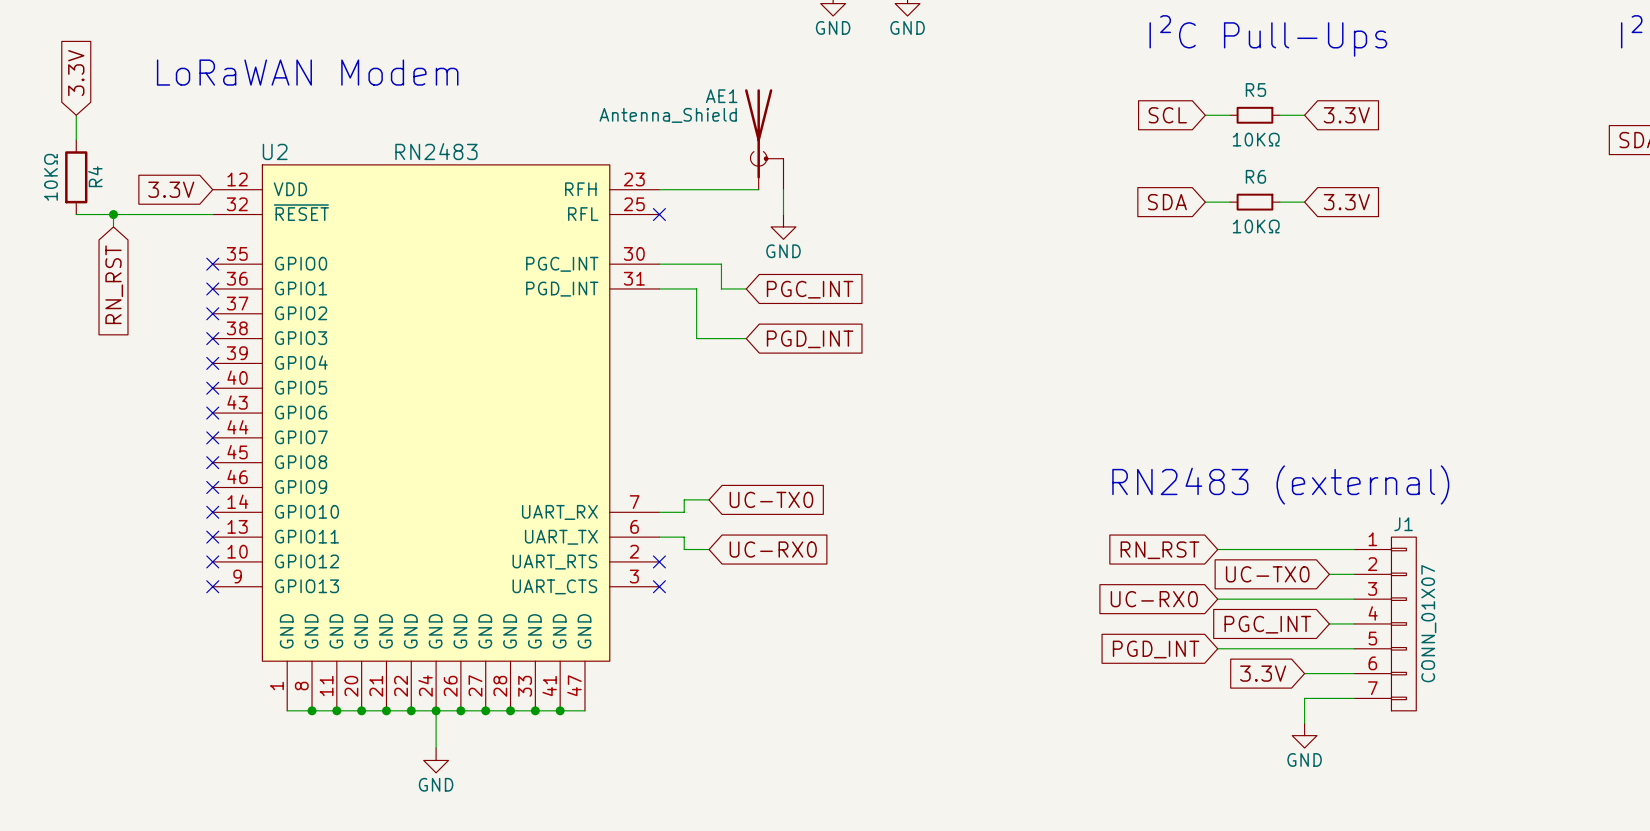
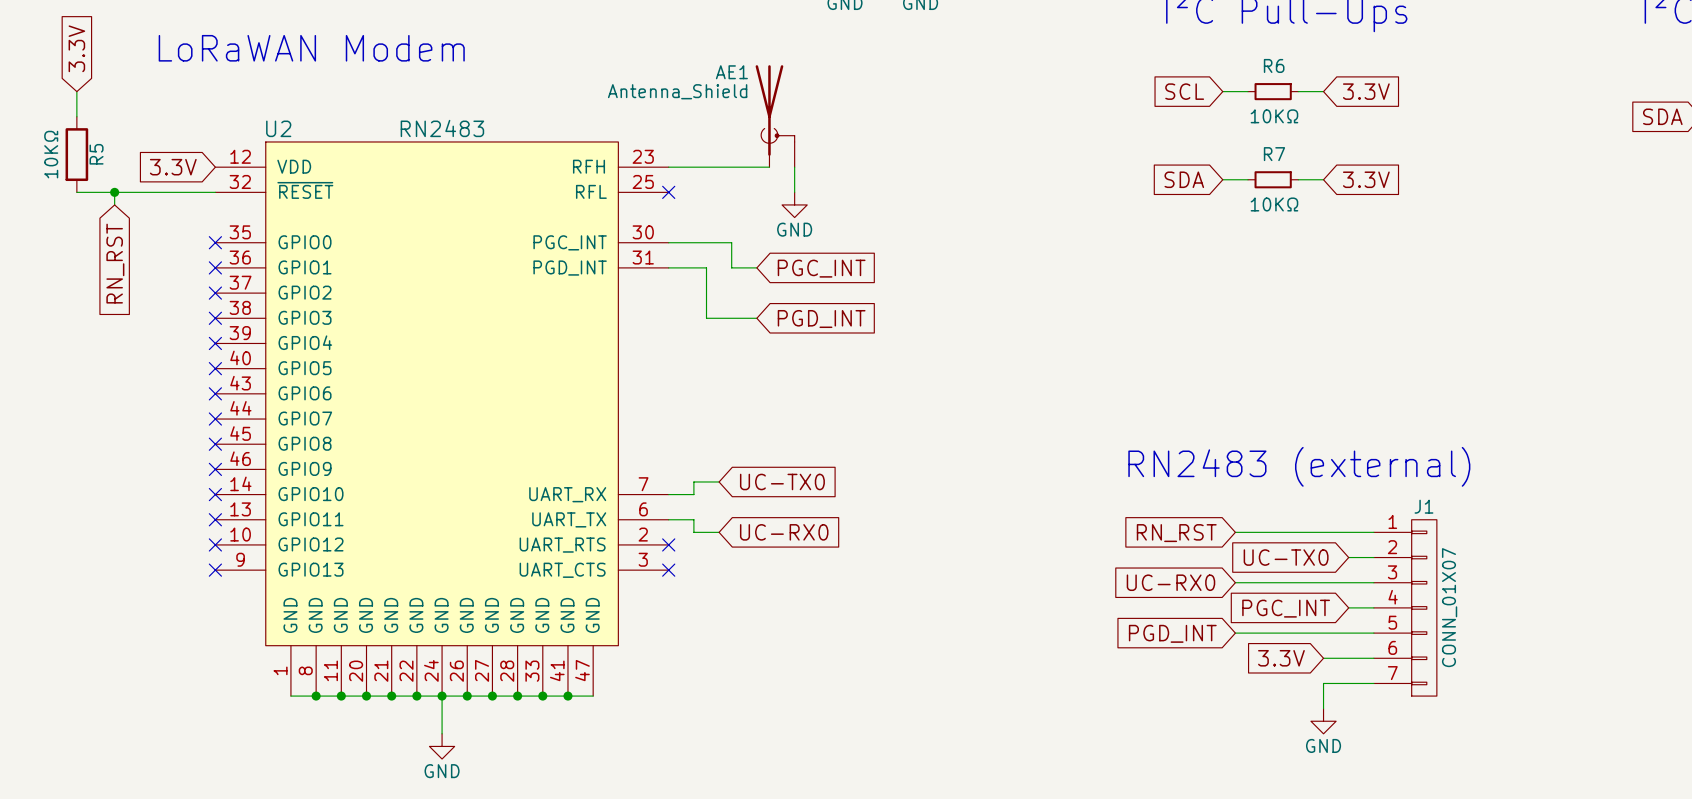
R5 name: R5 (1255, 89) -> R6 (1274, 65)
R4 name: R4 (95, 176) -> R5 (96, 154)
R6 name: R6 (1255, 176) -> R7 (1274, 154)

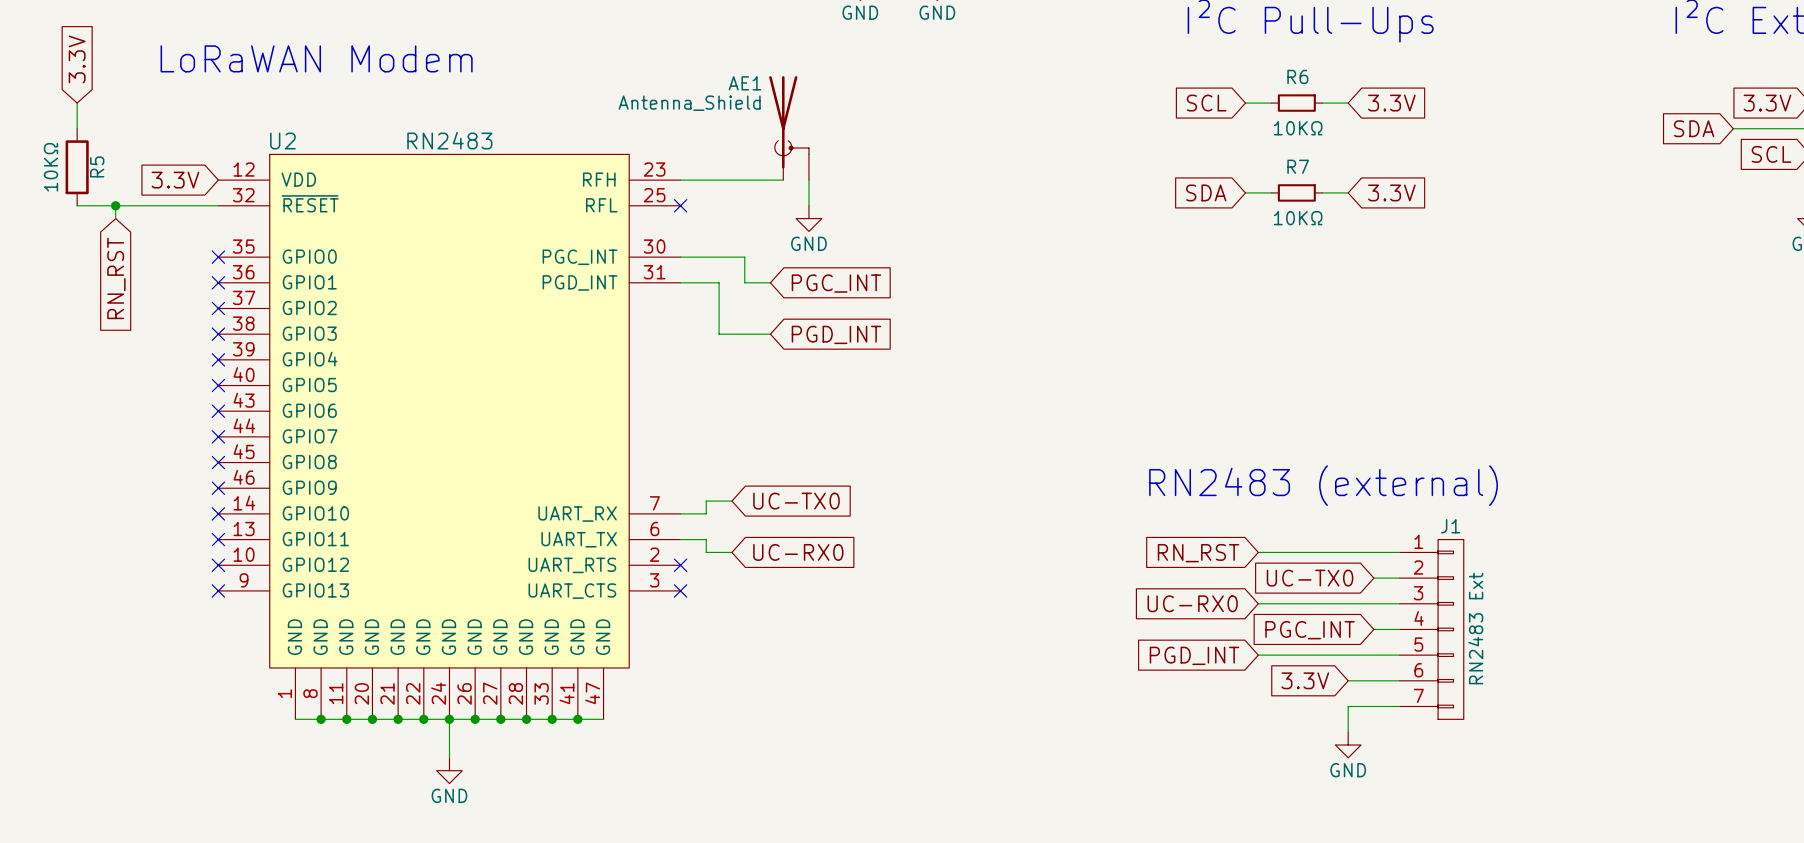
J1 value: CONN_01X07 (1449, 607) -> RN2483 Ext (1475, 628)

